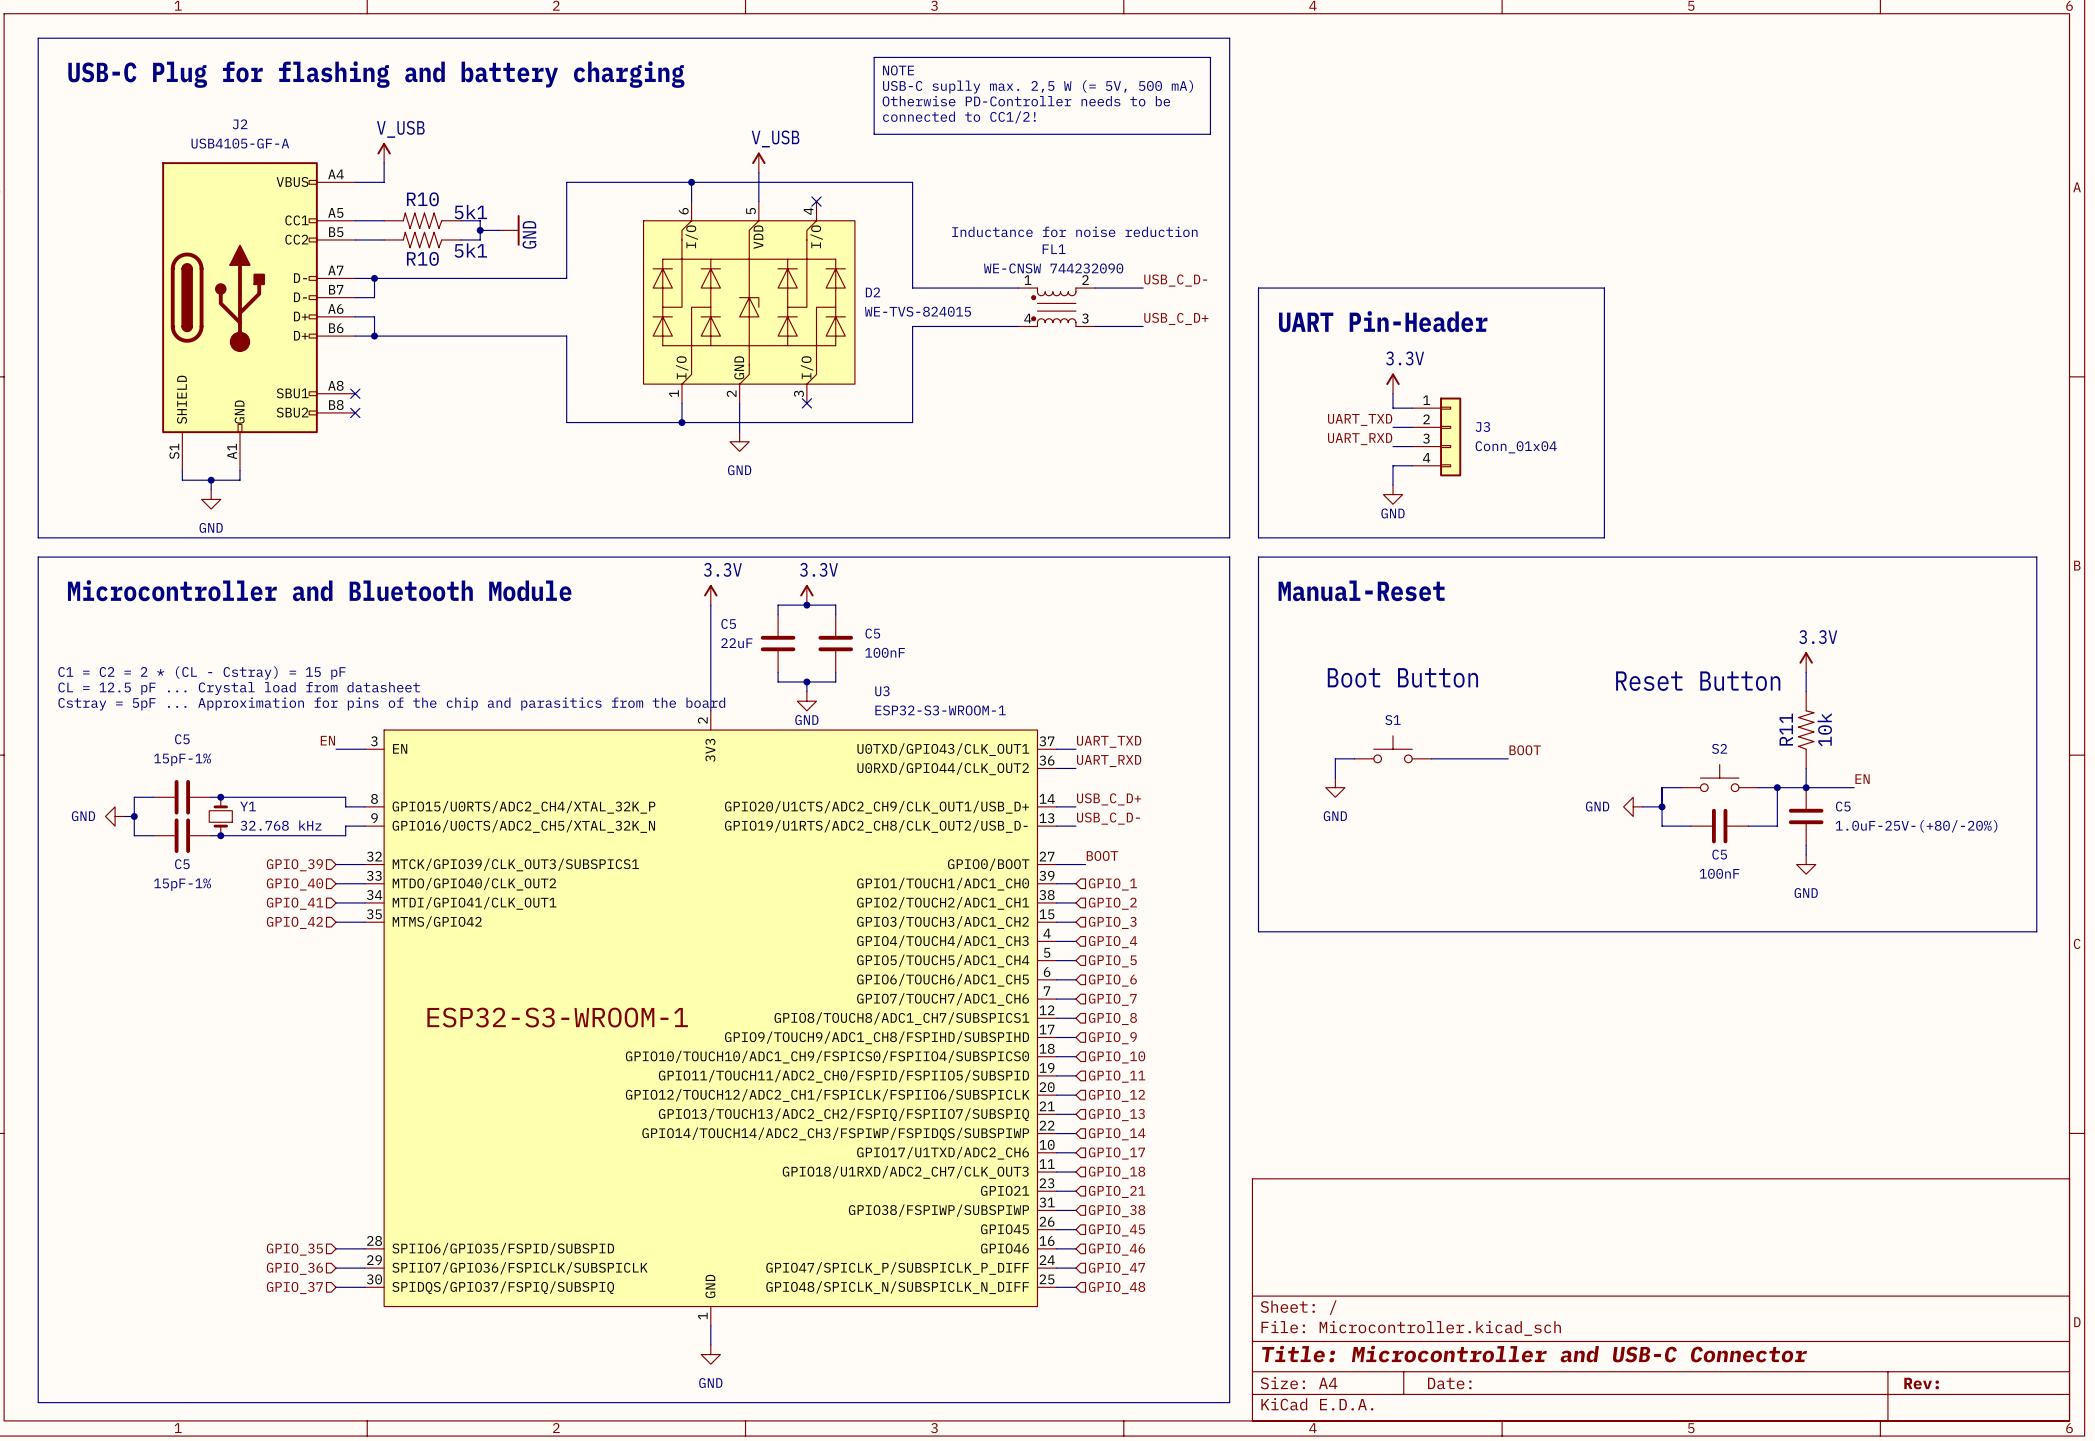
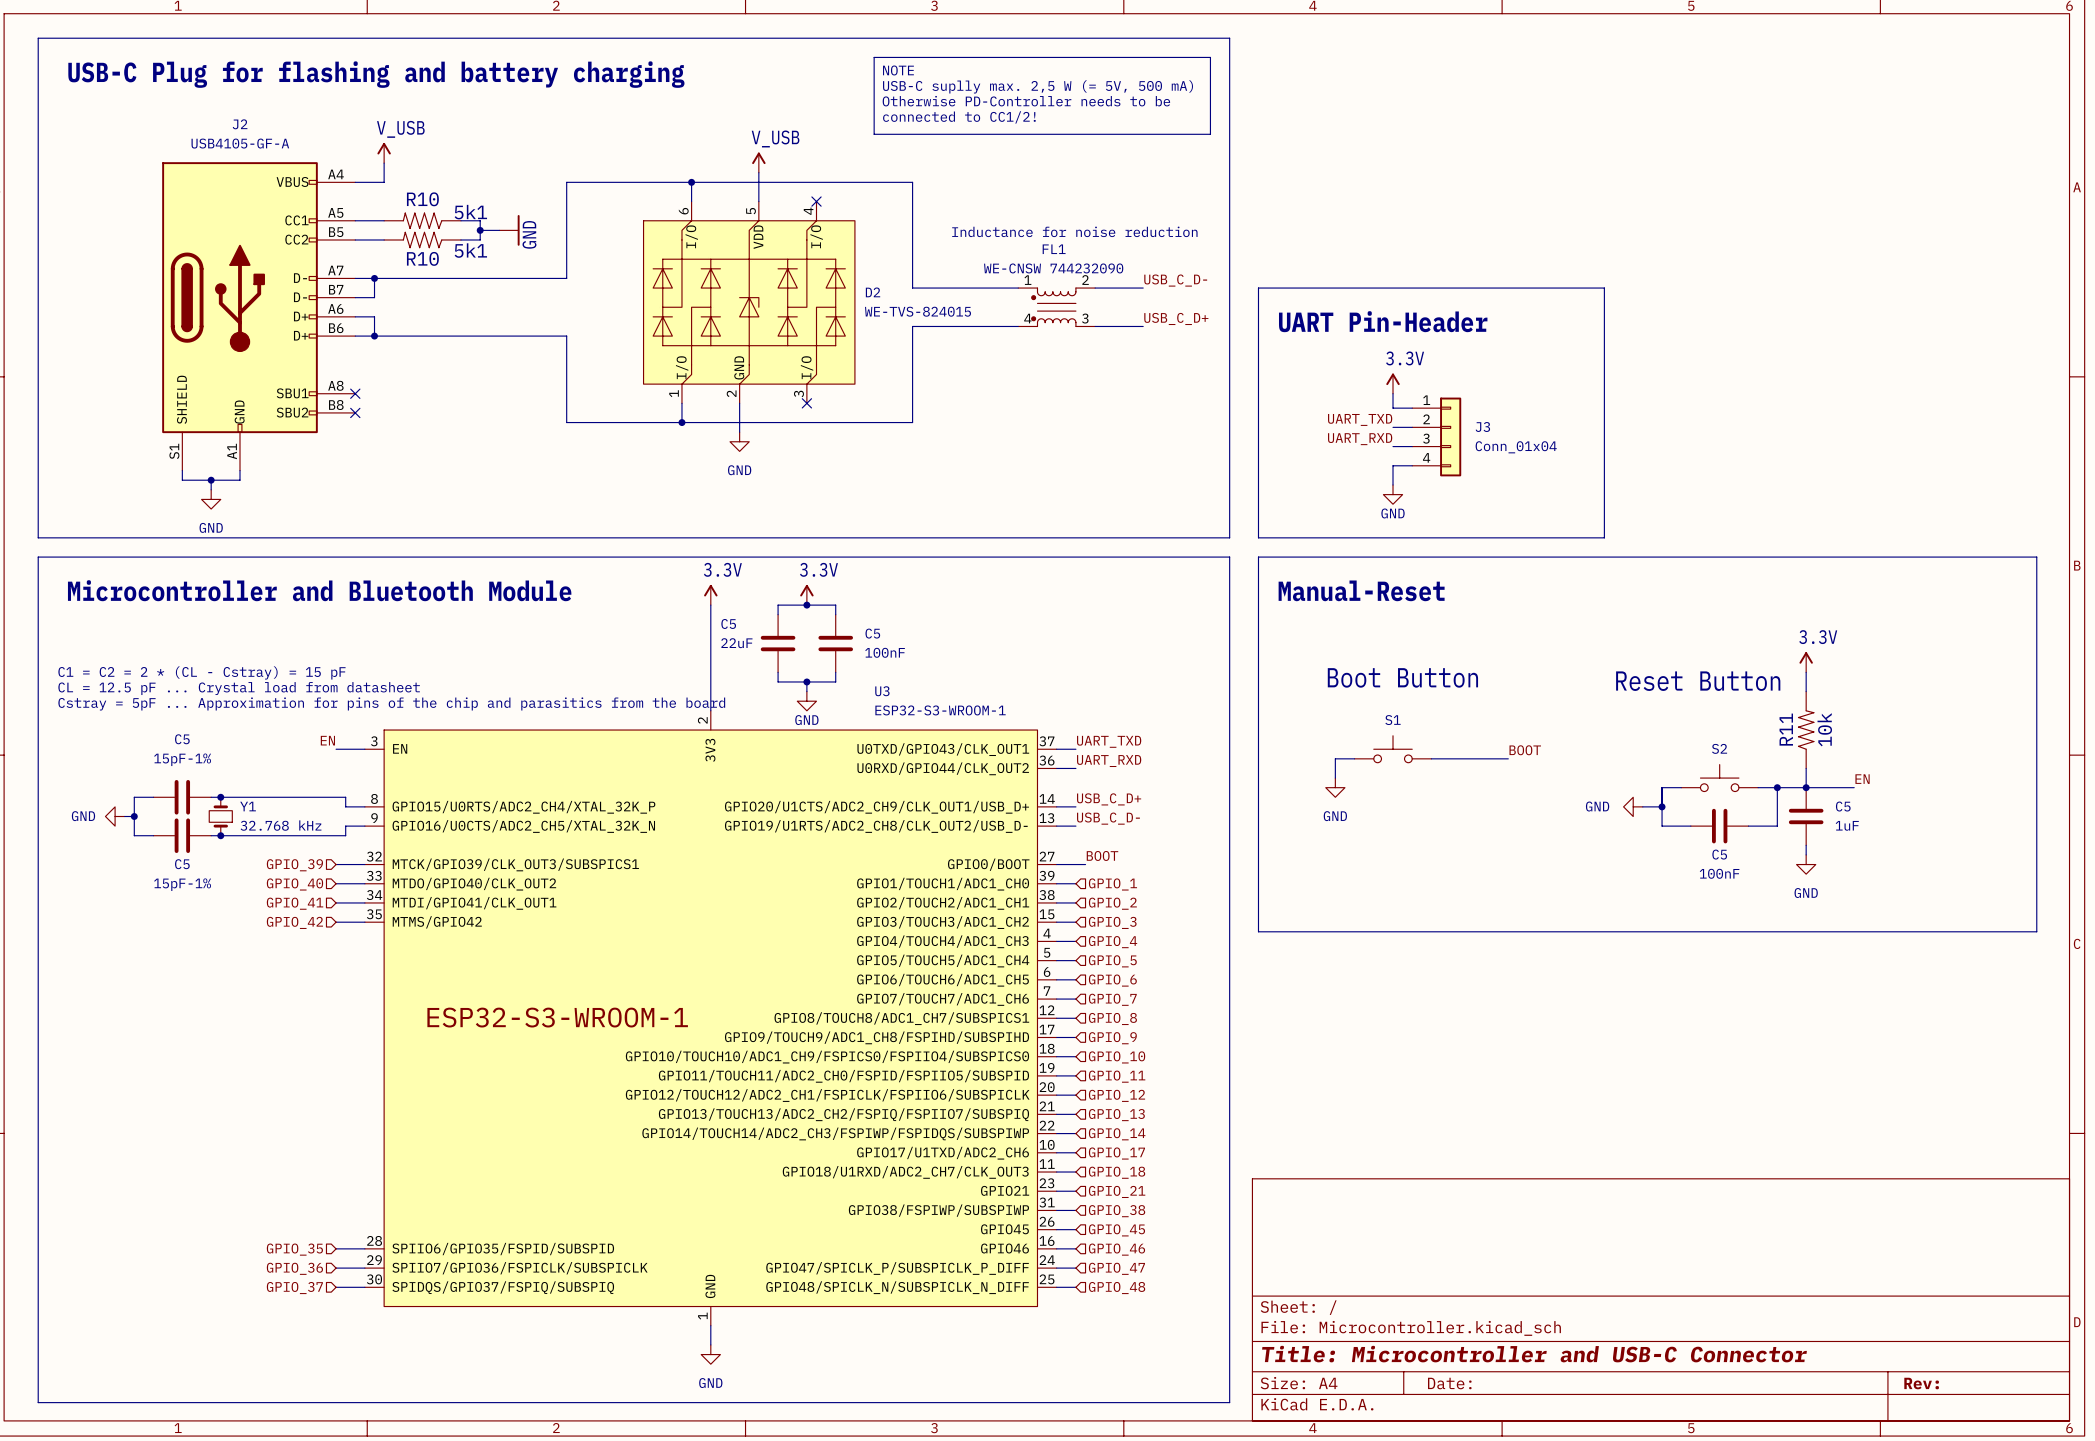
C5 value: 1.0uF-25V-(+80/-20%) (1916, 826) -> 1uF (1847, 825)

